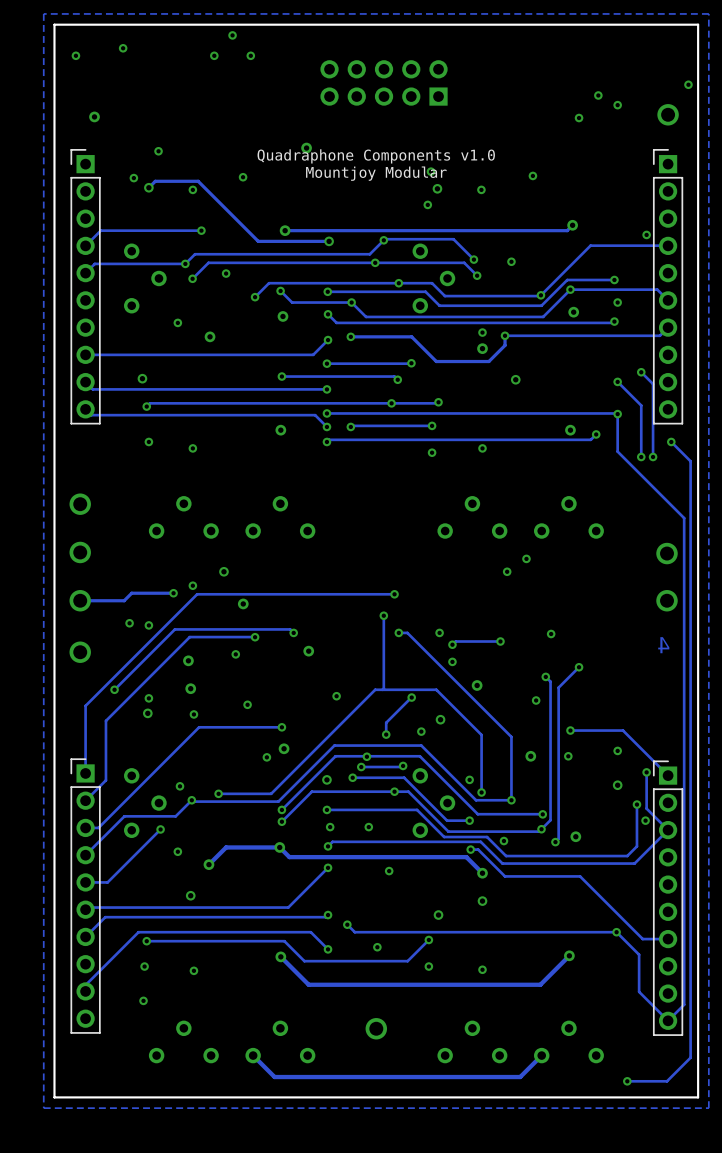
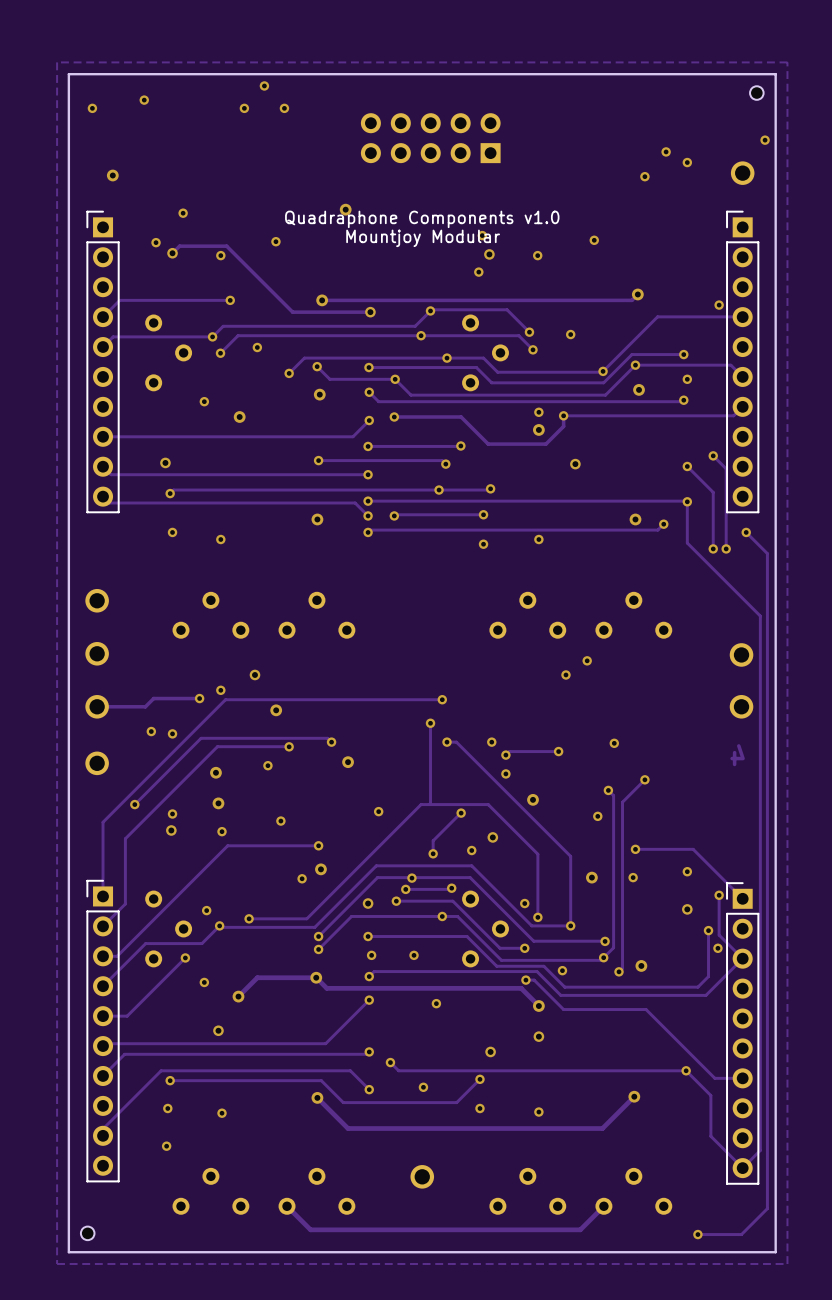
part: none -> (756, 93)
part: none -> (87, 1233)

